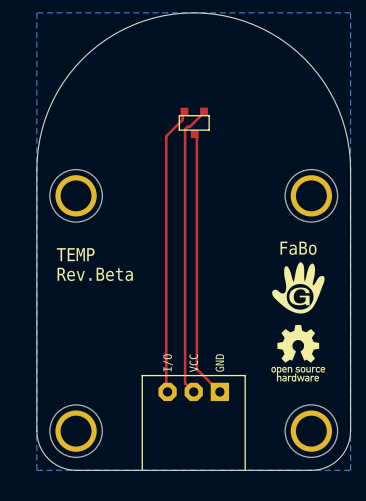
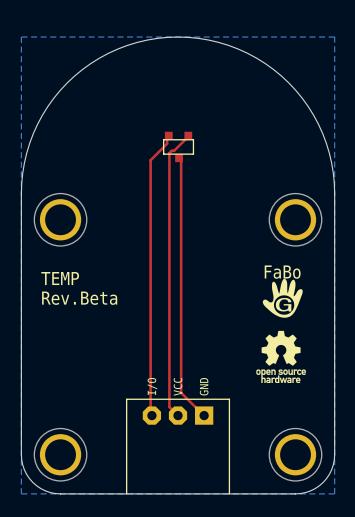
drawing: none -> [262, 278, 303, 318]
drawing: [271, 262, 326, 382] -> none
drawing: none -> [256, 330, 306, 384]

